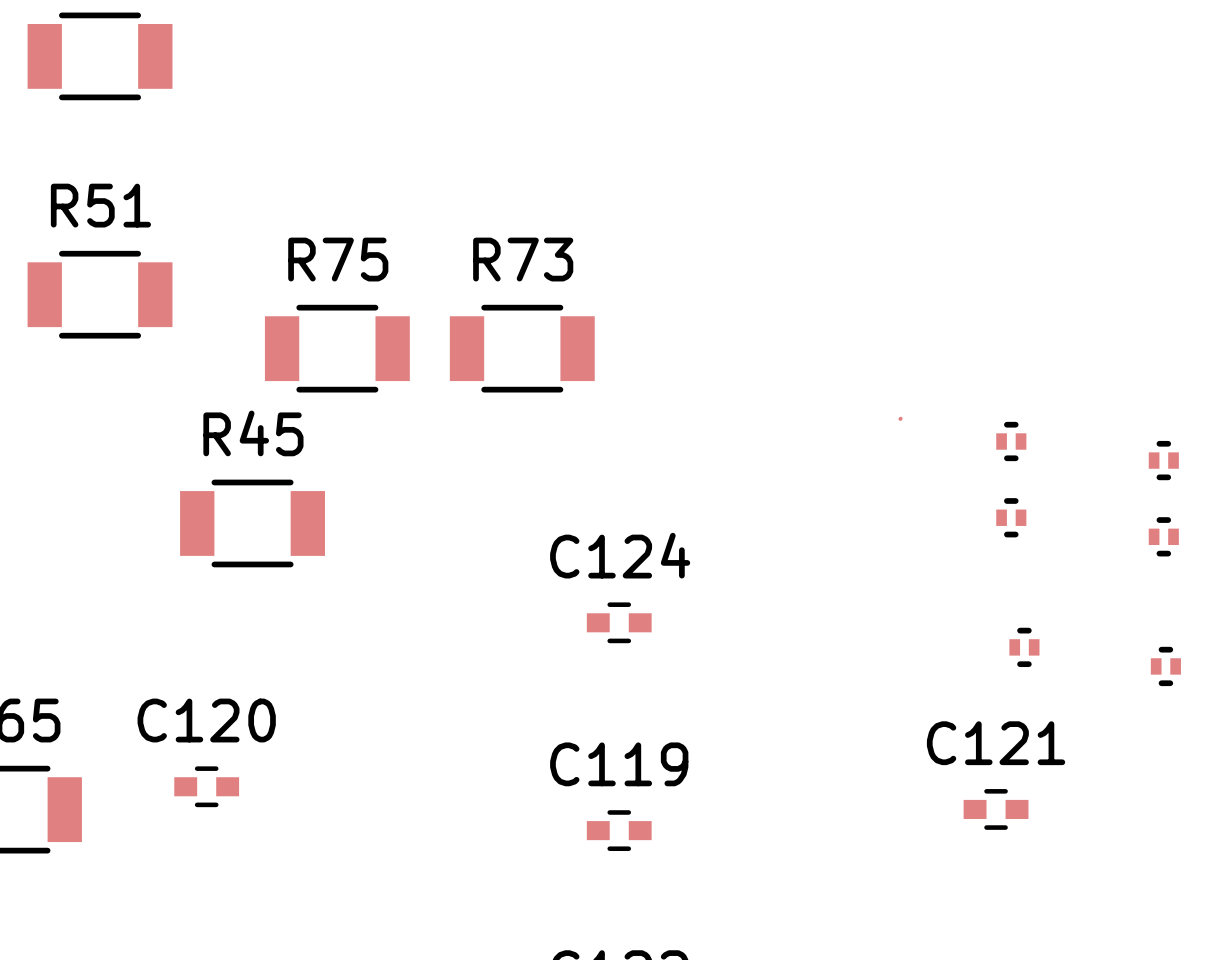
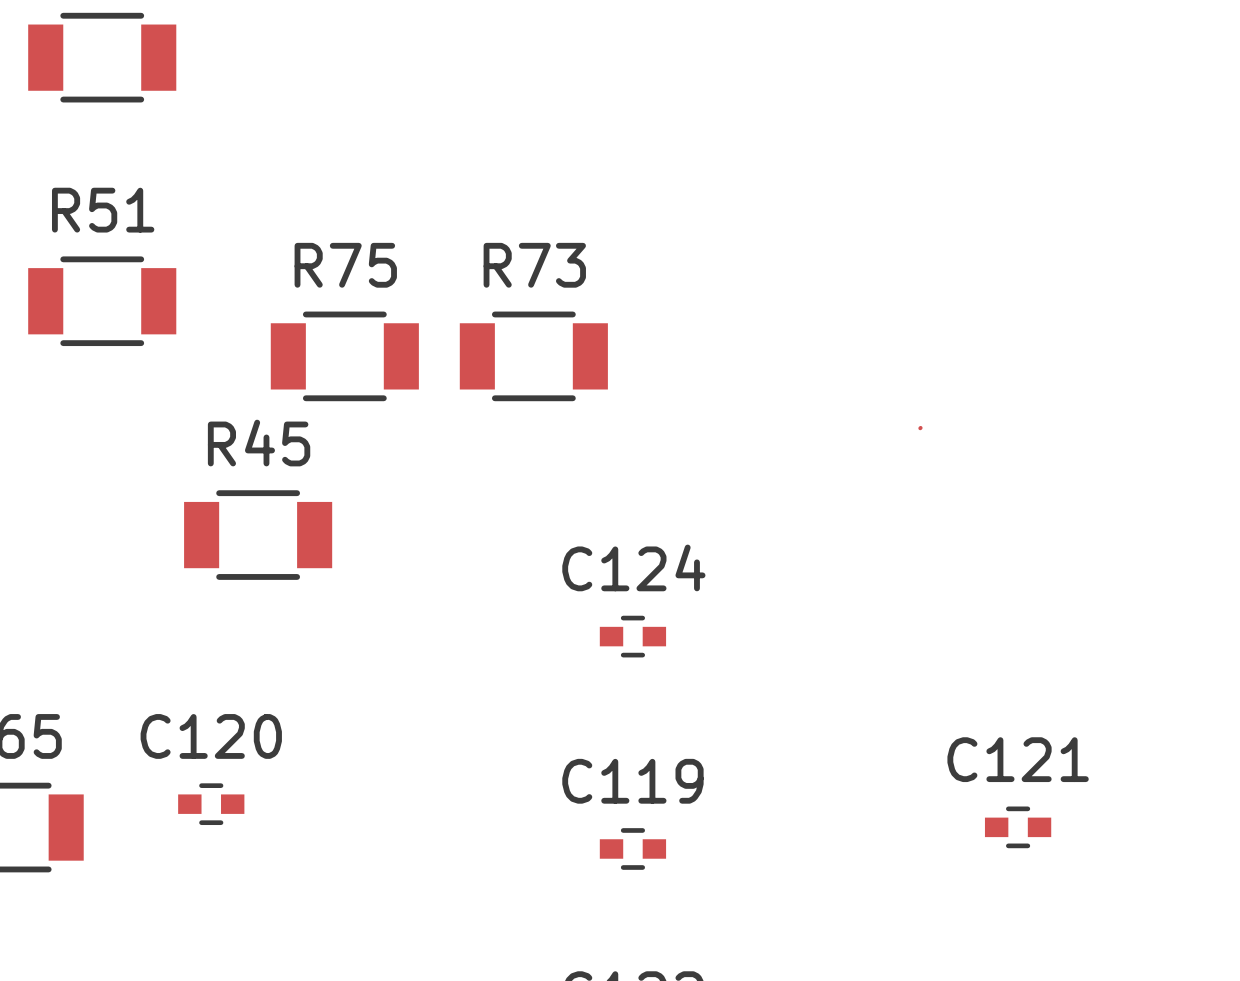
part: (1011, 441) -> none
part: (1163, 460) -> none
part: (1011, 517) -> none
part: (1163, 536) -> none
part: (1024, 647) -> none
part: (1165, 666) -> none

